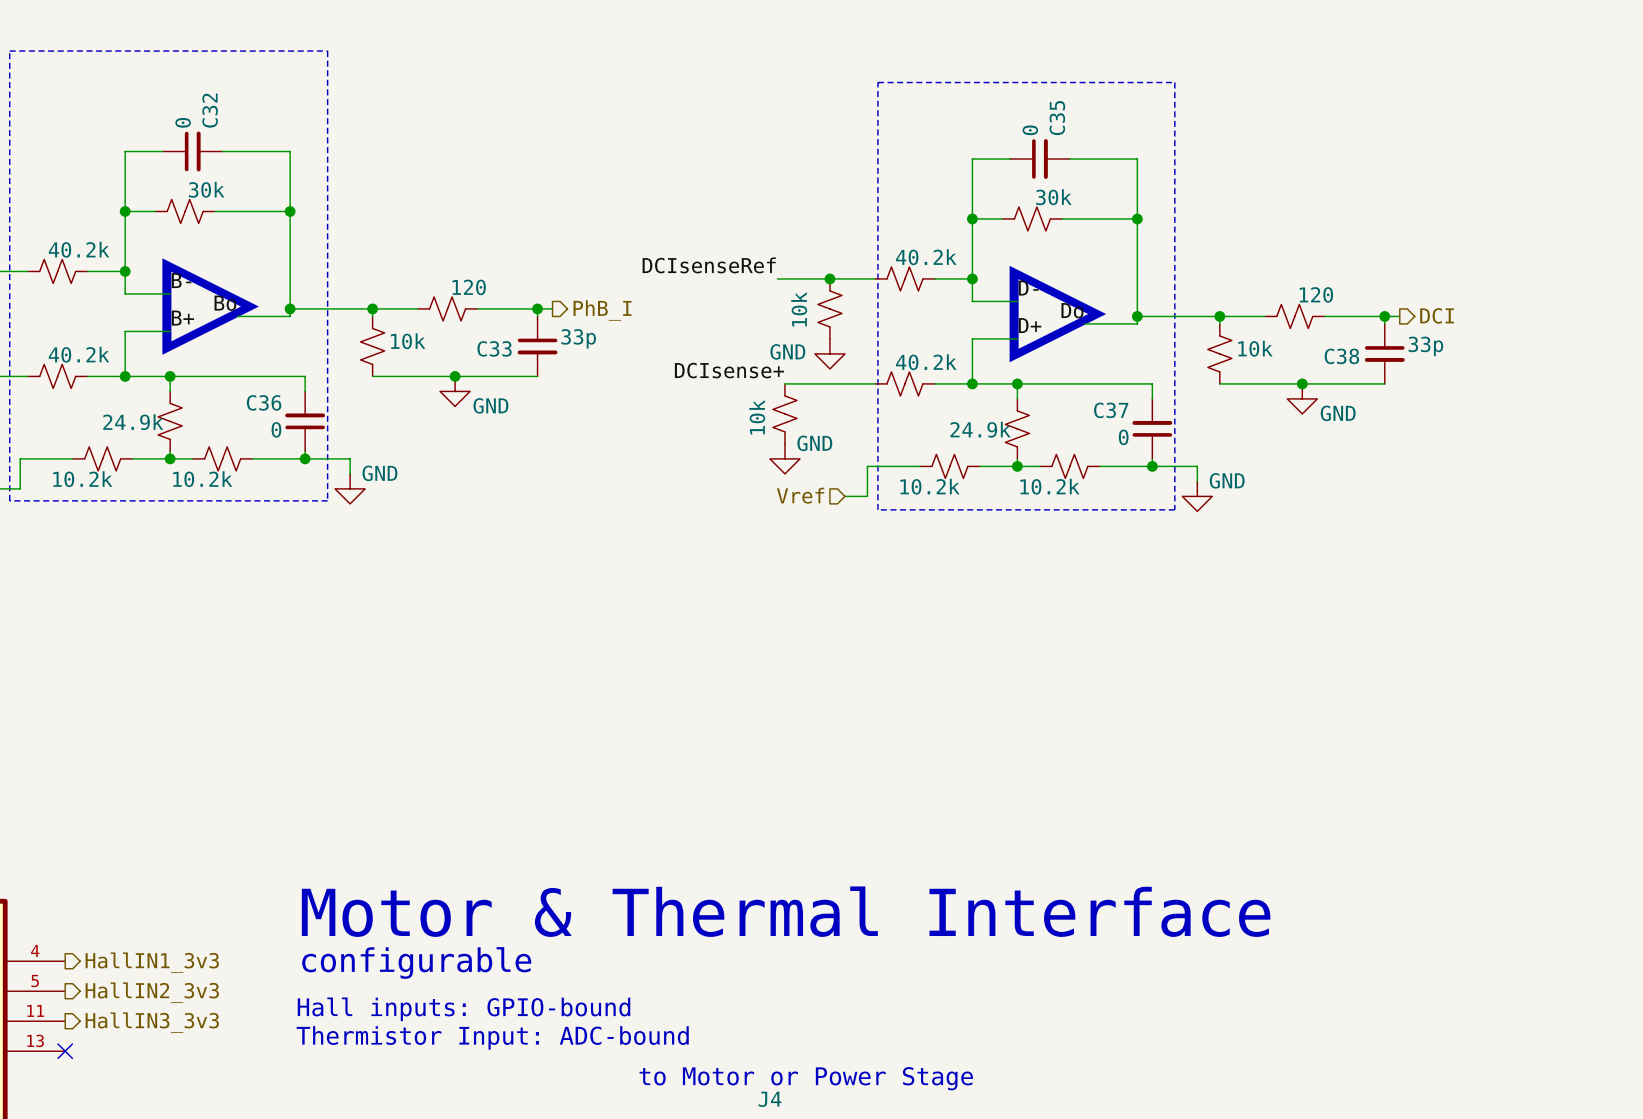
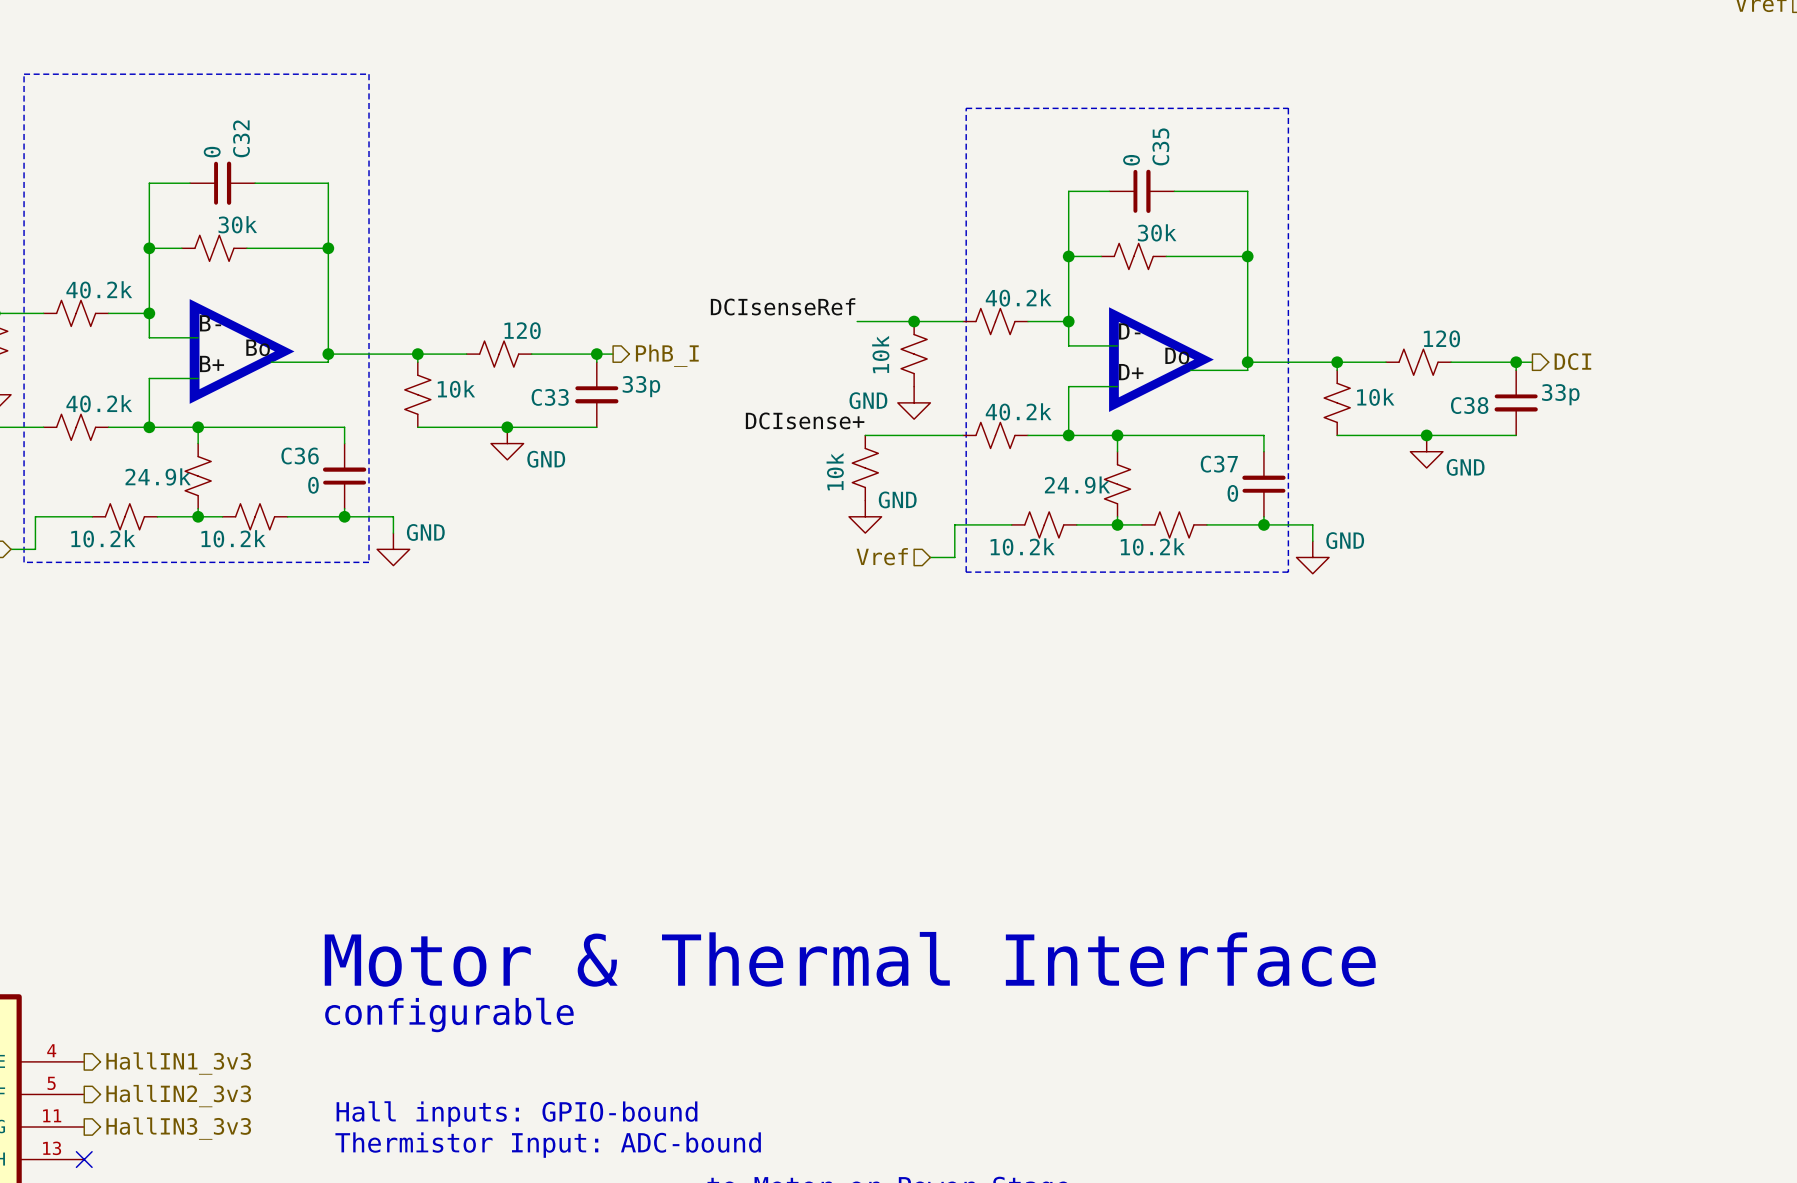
text position: Motor & Thermal Interface (786, 911) -> Motor & Thermal Interface (850, 959)
text position: configurable (416, 962) -> configurable (449, 1014)

